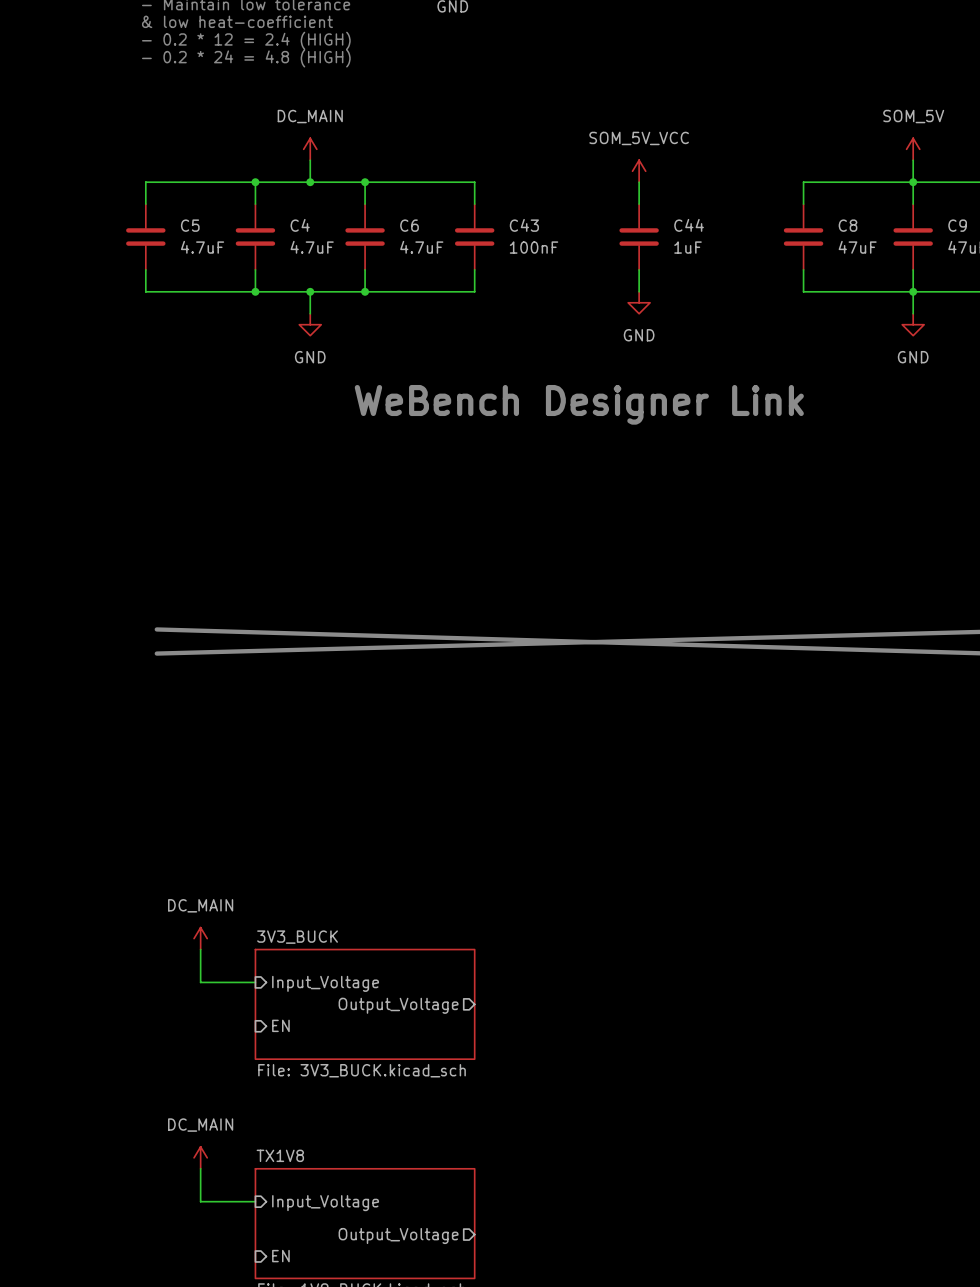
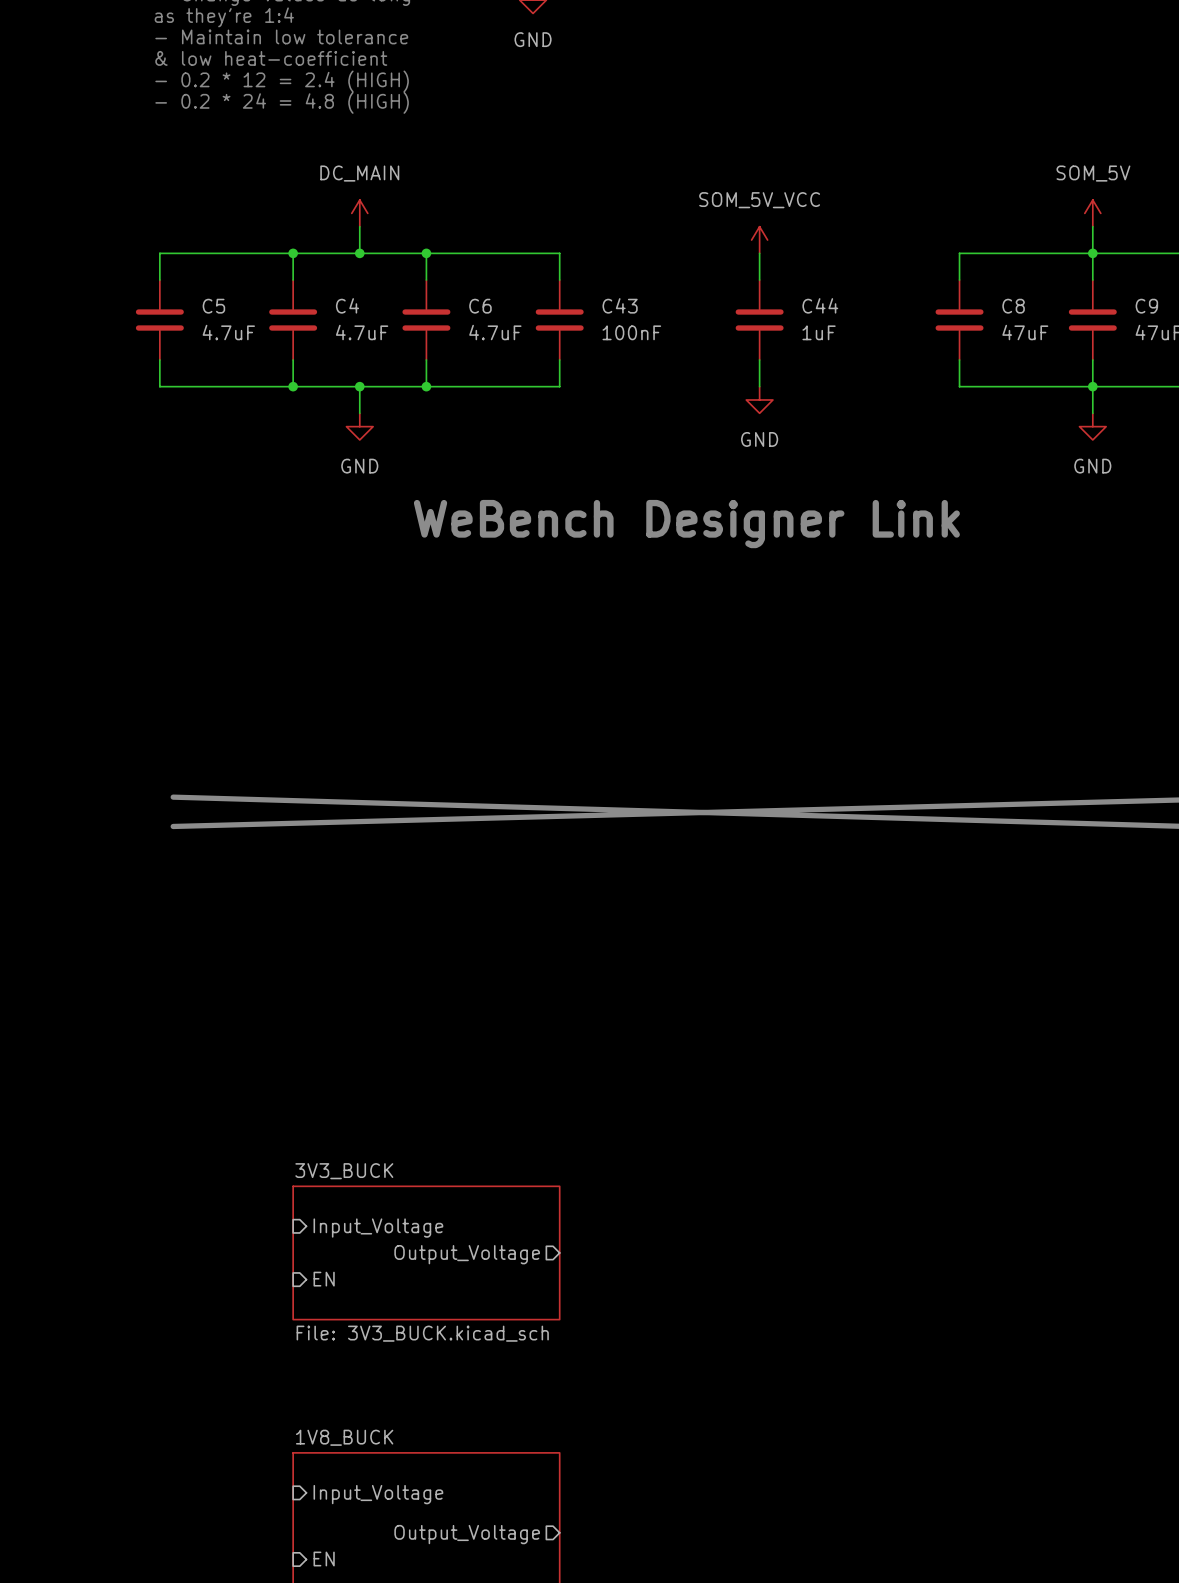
power symbol: DC_MAIN (200, 938) -> none
wire: (200, 949) (200, 982) (255, 982) -> none
sheet TX1V8 name: TX1V8 (280, 1155) -> 1V8_BUCK (344, 1437)
power symbol: DC_MAIN (200, 1157) -> none
wire: (200, 1168) (200, 1201) (255, 1201) -> none

